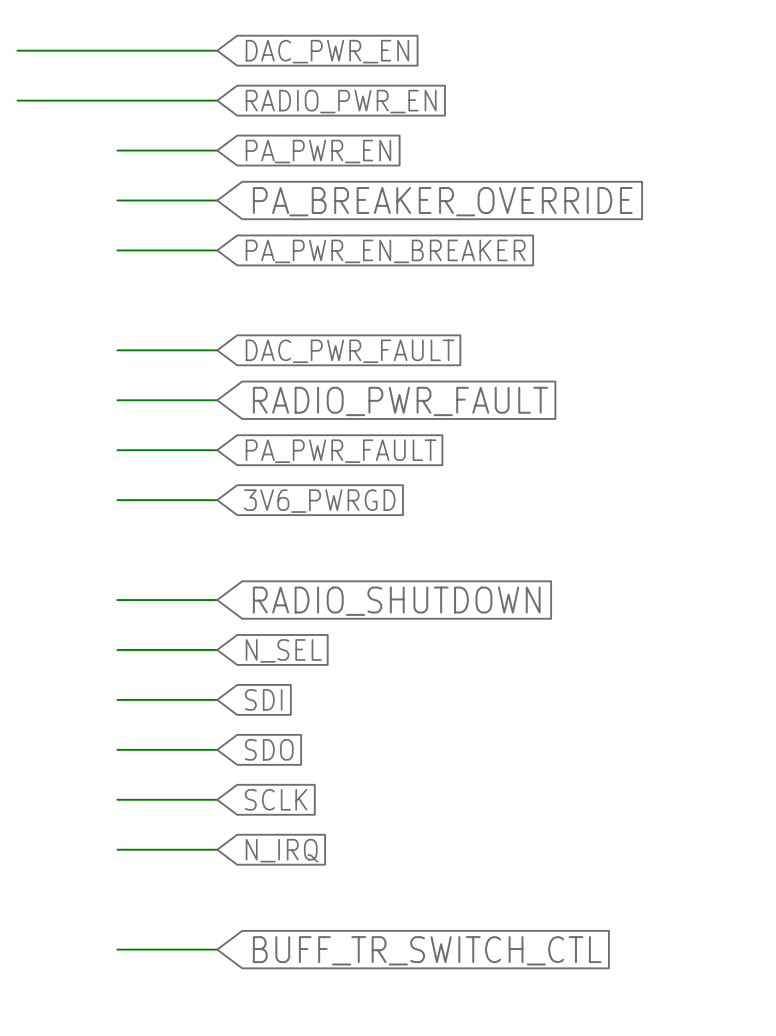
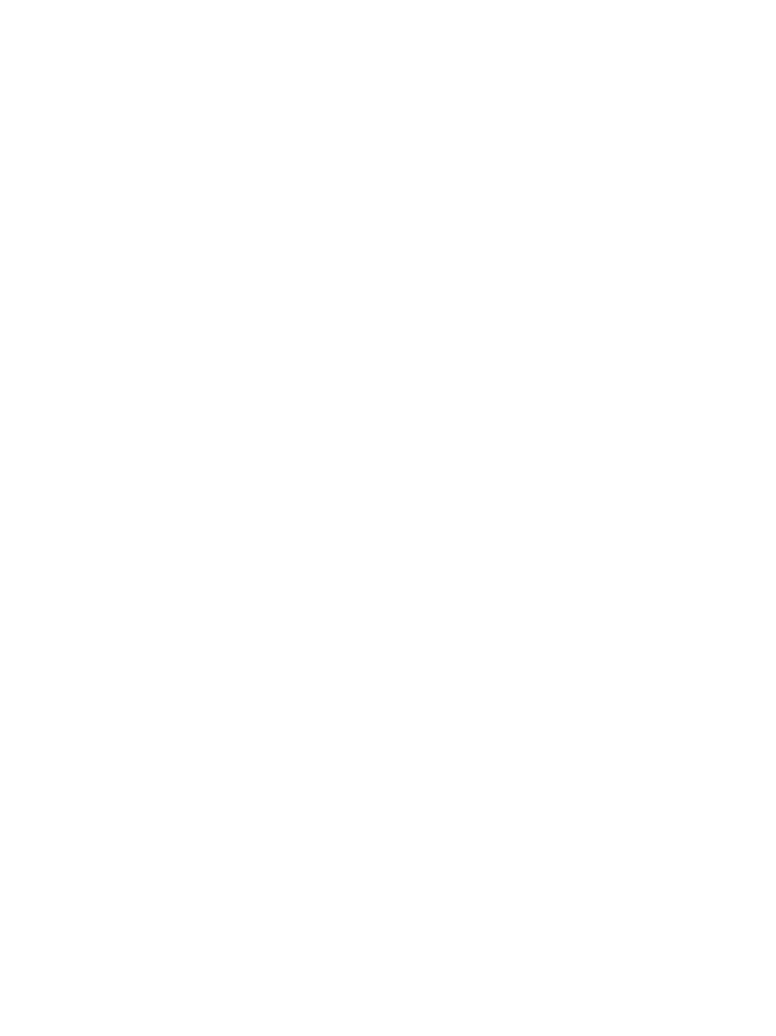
wire: (17, 50) (217, 50) -> none
global label: DAC_PWR_EN (327, 51) -> none
wire: (17, 100) (217, 100) -> none
global label: RADIO_PWR_EN (341, 101) -> none
wire: (117, 150) (217, 150) -> none
global label: PA_PWR_EN (318, 151) -> none
wire: (117, 200) (217, 200) -> none
global label: PA_BREAKER_OVERRIDE (442, 201) -> none
wire: (117, 250) (217, 250) -> none
global label: PA_PWR_EN_BREAKER (385, 251) -> none
wire: (117, 350) (217, 350) -> none
global label: DAC_PWR_FAULT (350, 351) -> none
wire: (117, 400) (217, 400) -> none
global label: RADIO_PWR_FAULT (400, 401) -> none
wire: (117, 450) (217, 450) -> none
global label: PA_PWR_FAULT (341, 451) -> none
wire: (117, 500) (217, 500) -> none
global label: 3V6_PWRGD (319, 501) -> none
wire: (117, 600) (217, 600) -> none
global label: RADIO_SHUTDOWN (396, 601) -> none
wire: (117, 649) (217, 649) -> none
global label: N_SEL (283, 650) -> none
wire: (117, 699) (217, 699) -> none
global label: SDI (263, 699) -> none
wire: (117, 749) (217, 749) -> none
global label: SDO (269, 749) -> none
wire: (117, 799) (217, 799) -> none
global label: SCLK (276, 799) -> none
wire: (117, 849) (217, 849) -> none
global label: N_IRQ (282, 850) -> none
wire: (117, 949) (217, 949) -> none
global label: BUFF_TR_SWITCH_CTL (427, 950) -> none

